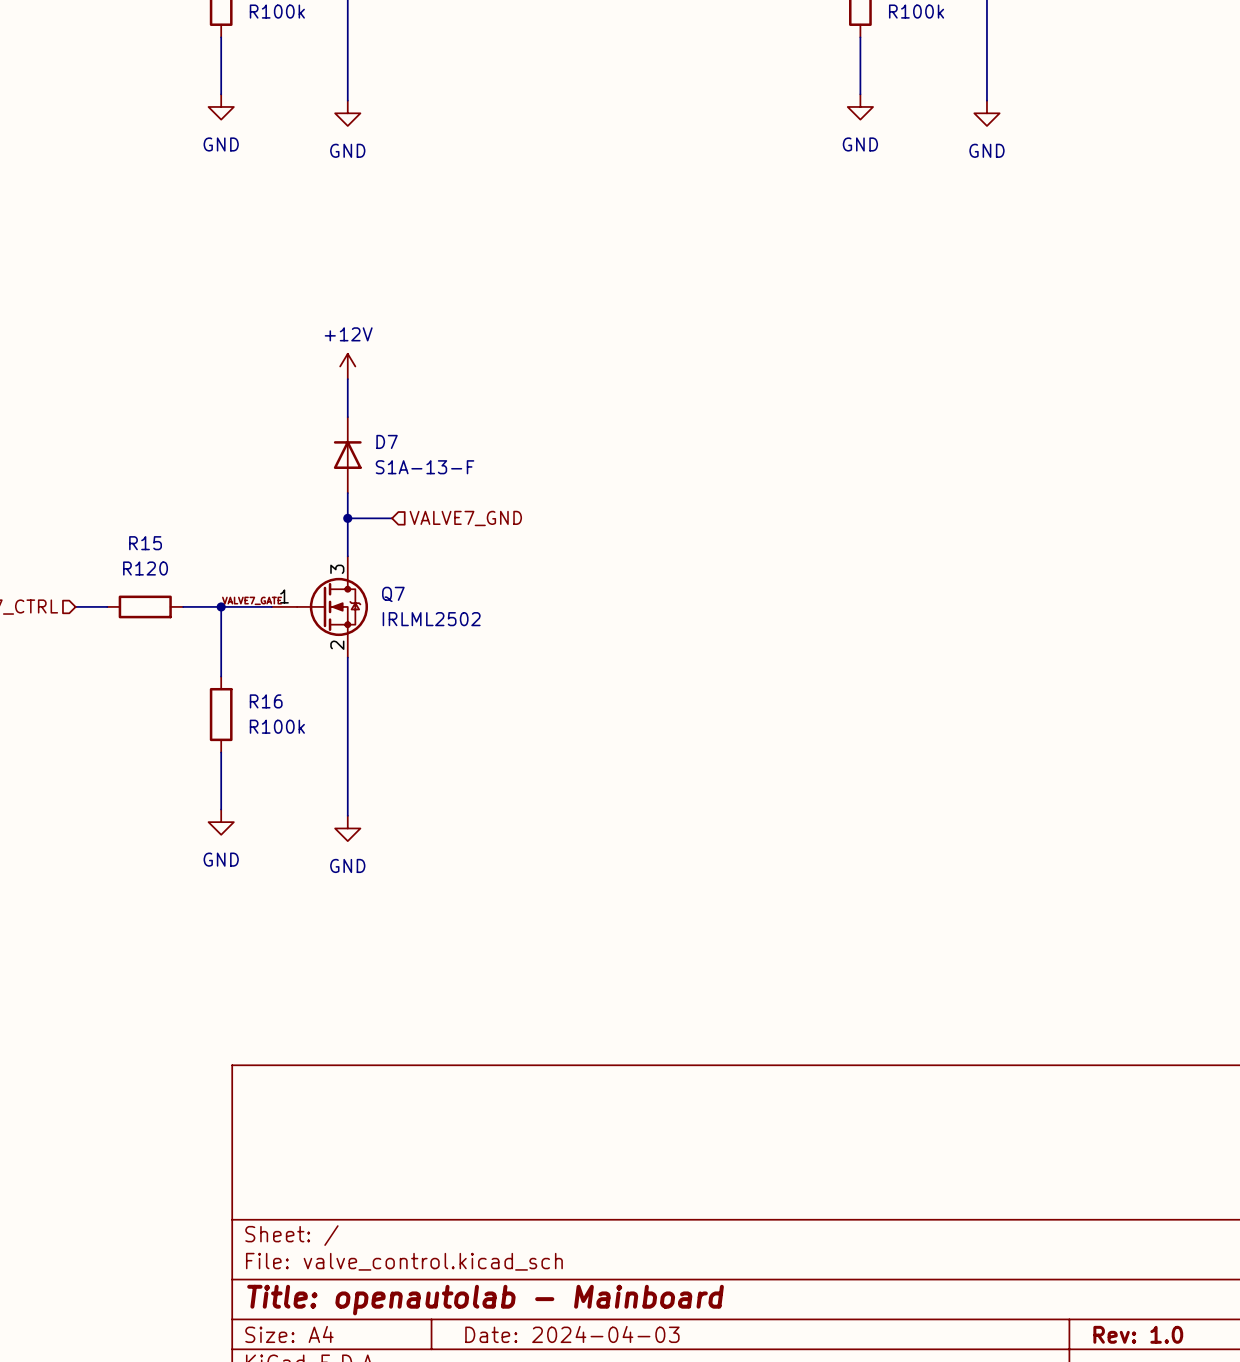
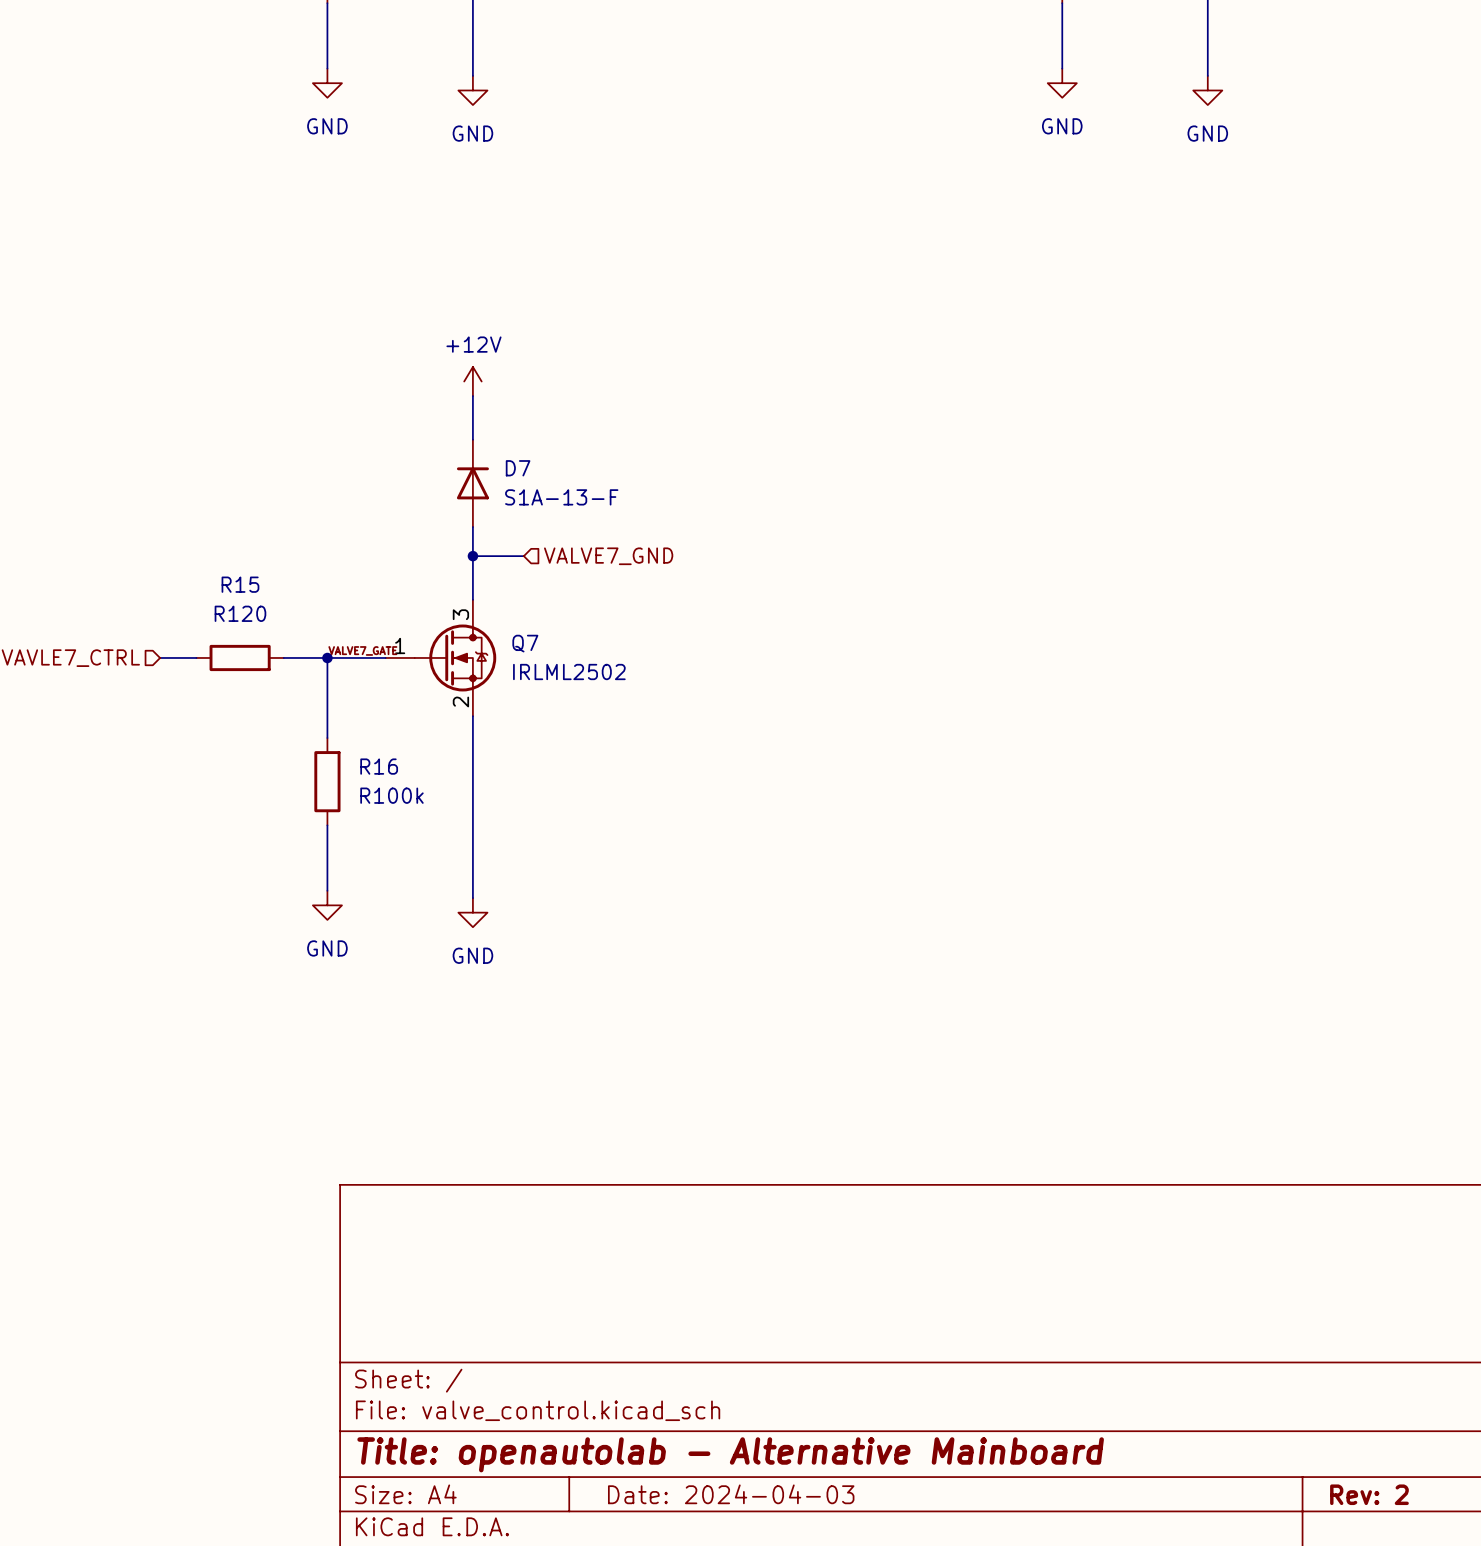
title block: Title: openautolab - Mainboard (485, 1300) -> Title: openautolab - Alternative Mainboard (730, 1454)
title block: Rev: 1.0 (1138, 1334) -> Rev: 2 (1369, 1494)

